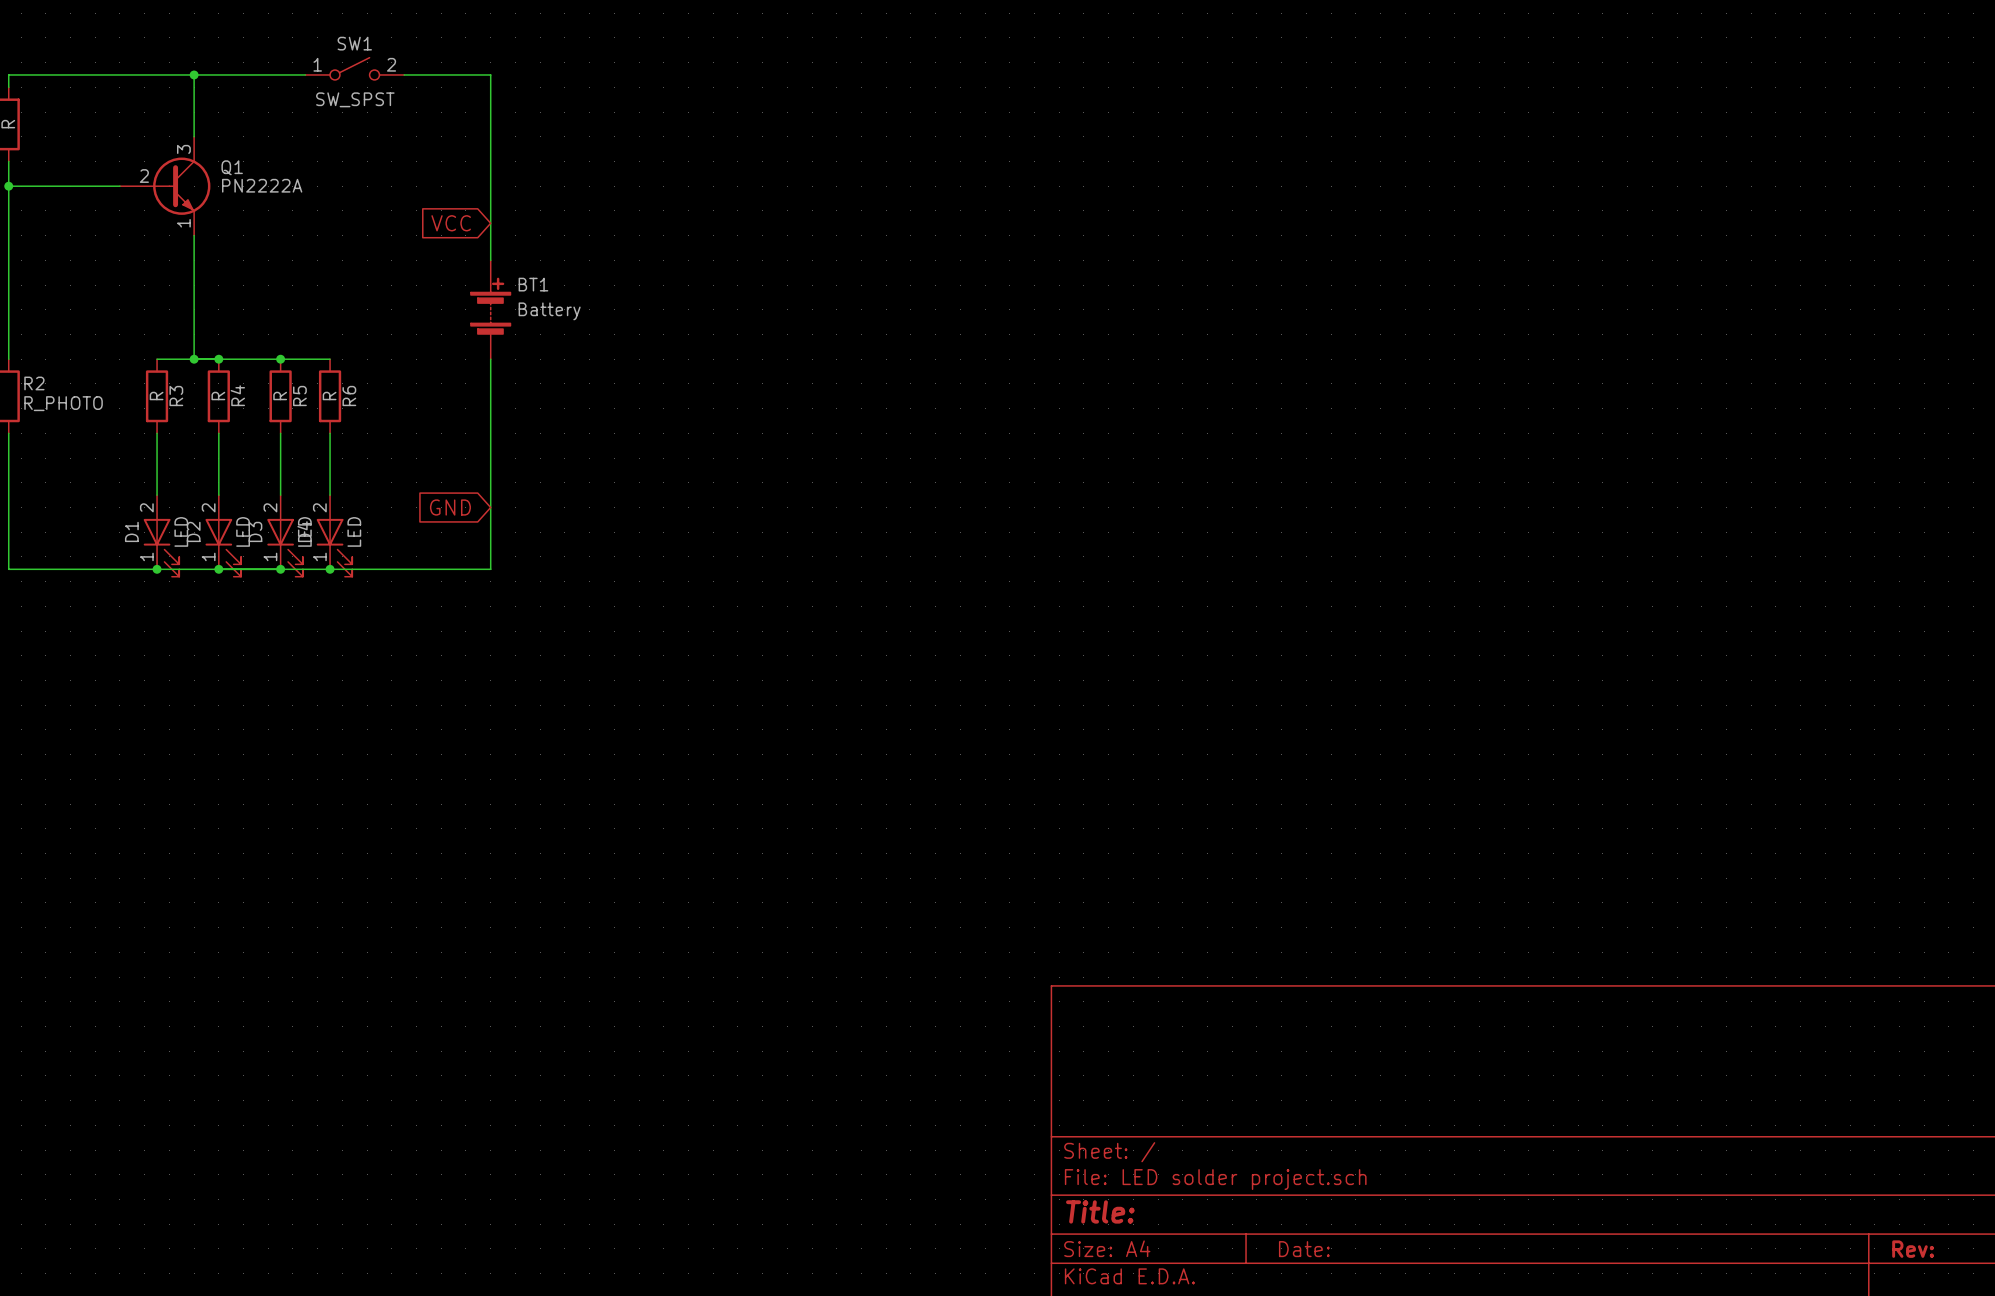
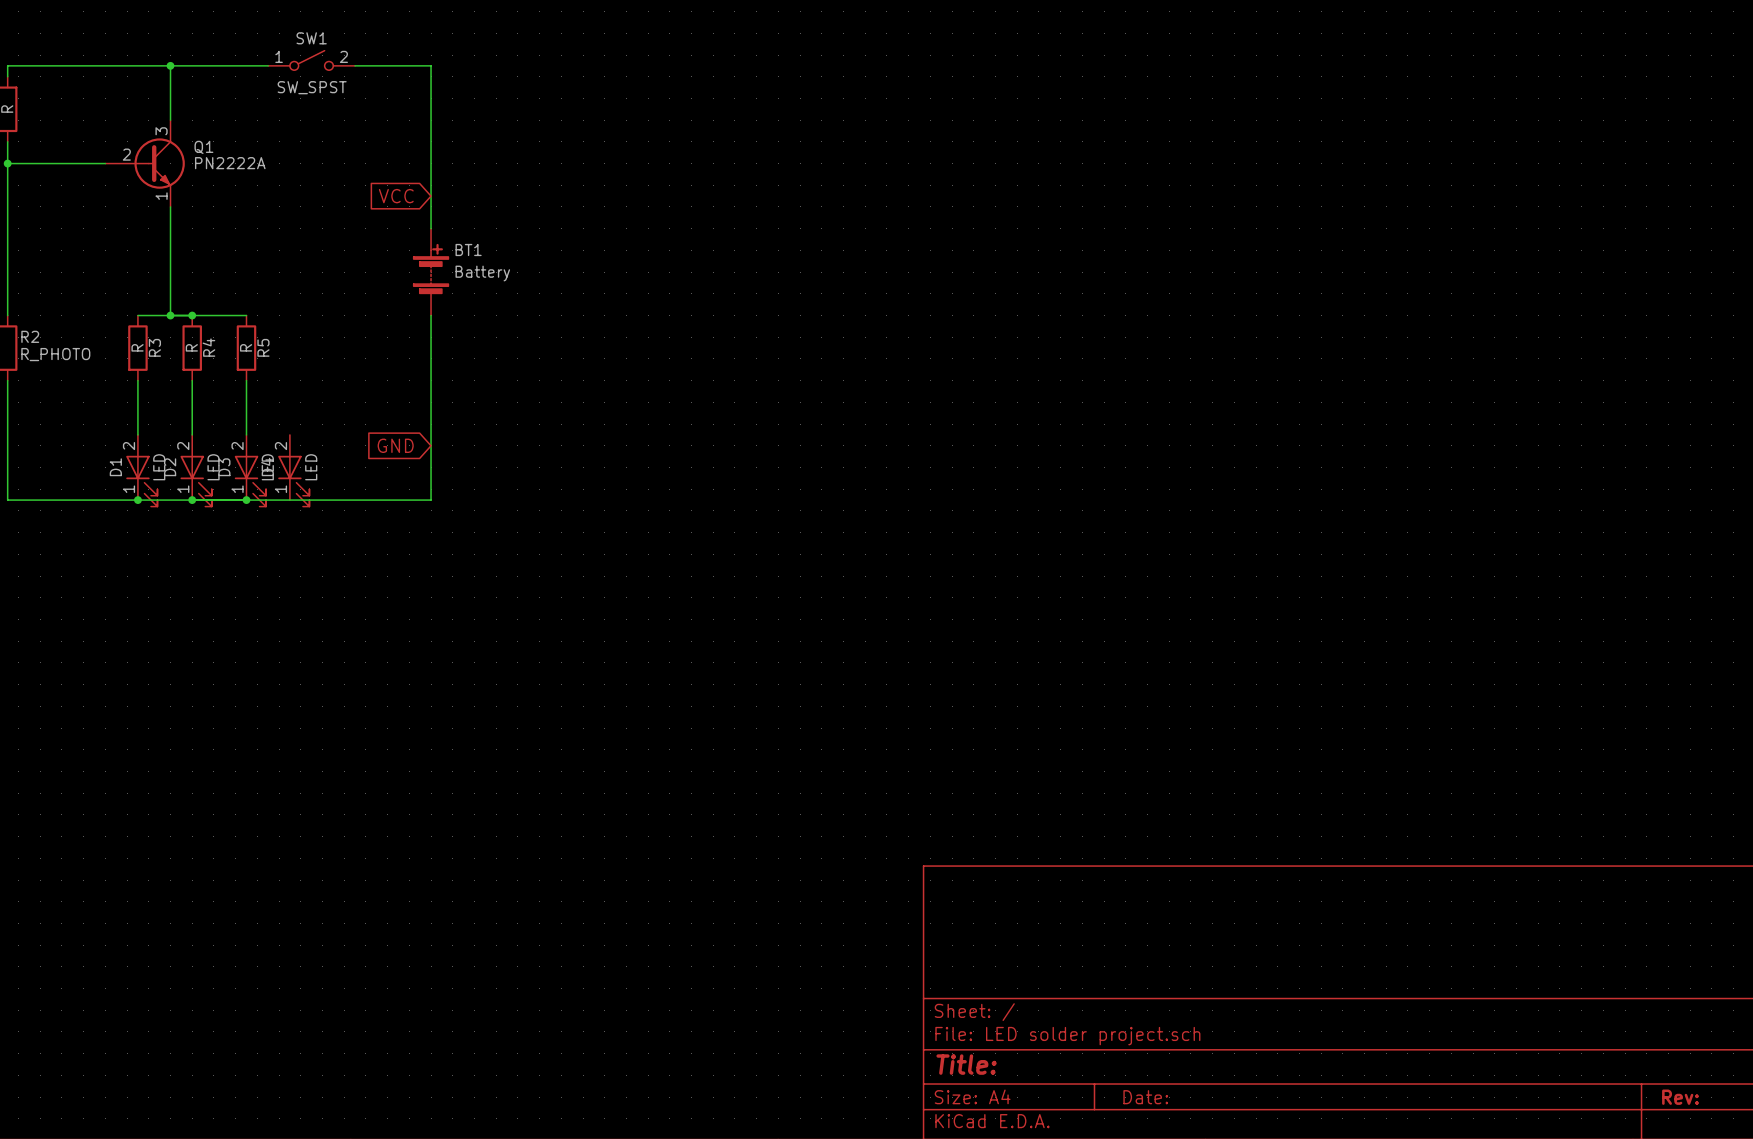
wire: (280, 359) (330, 359) -> none
junction: (280, 359) -> none
R6: R (330, 396) -> none
wire: (330, 433) (330, 495) -> none
junction: (330, 569) -> none

